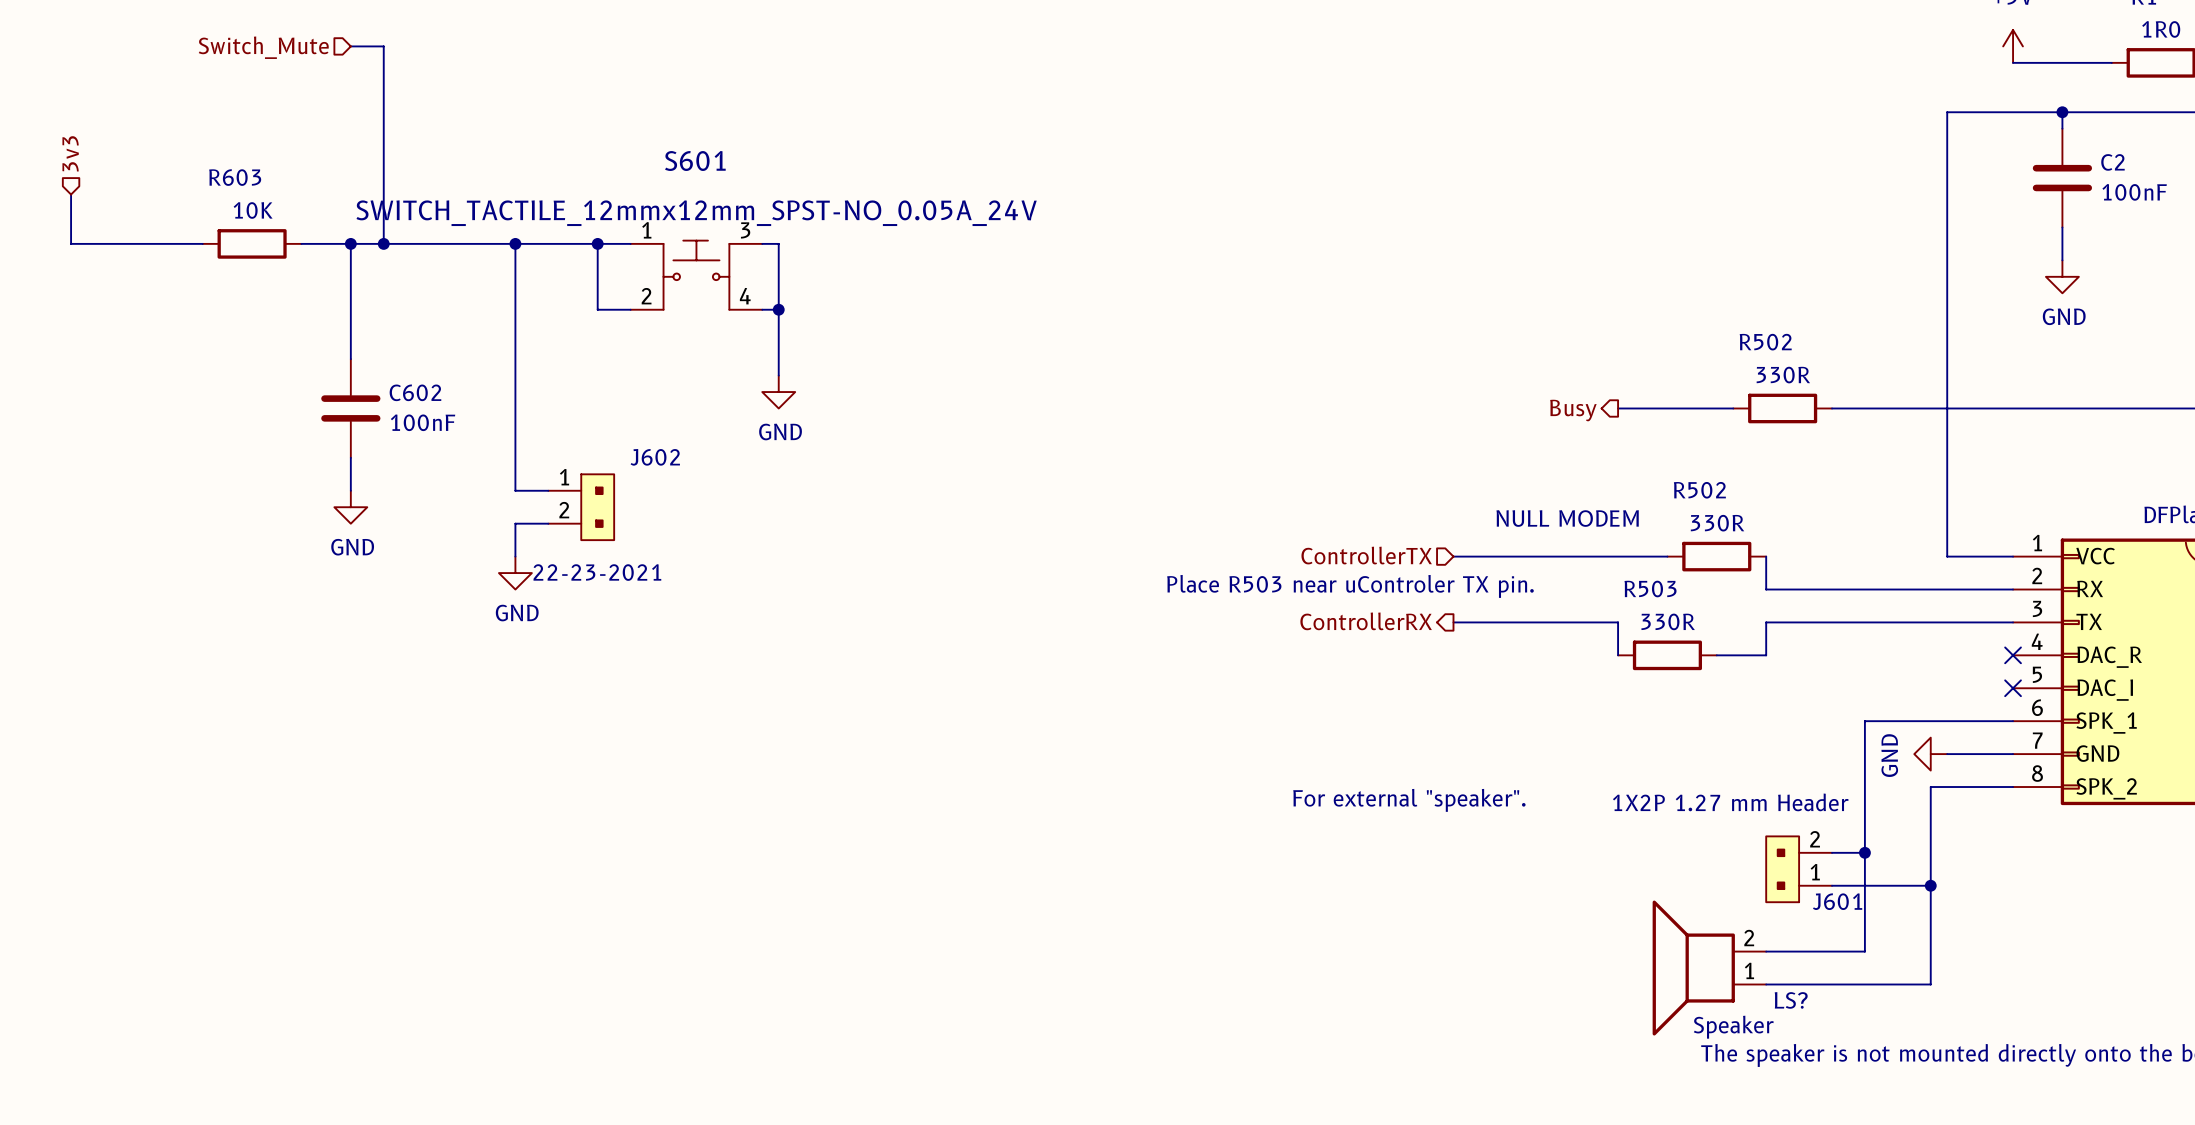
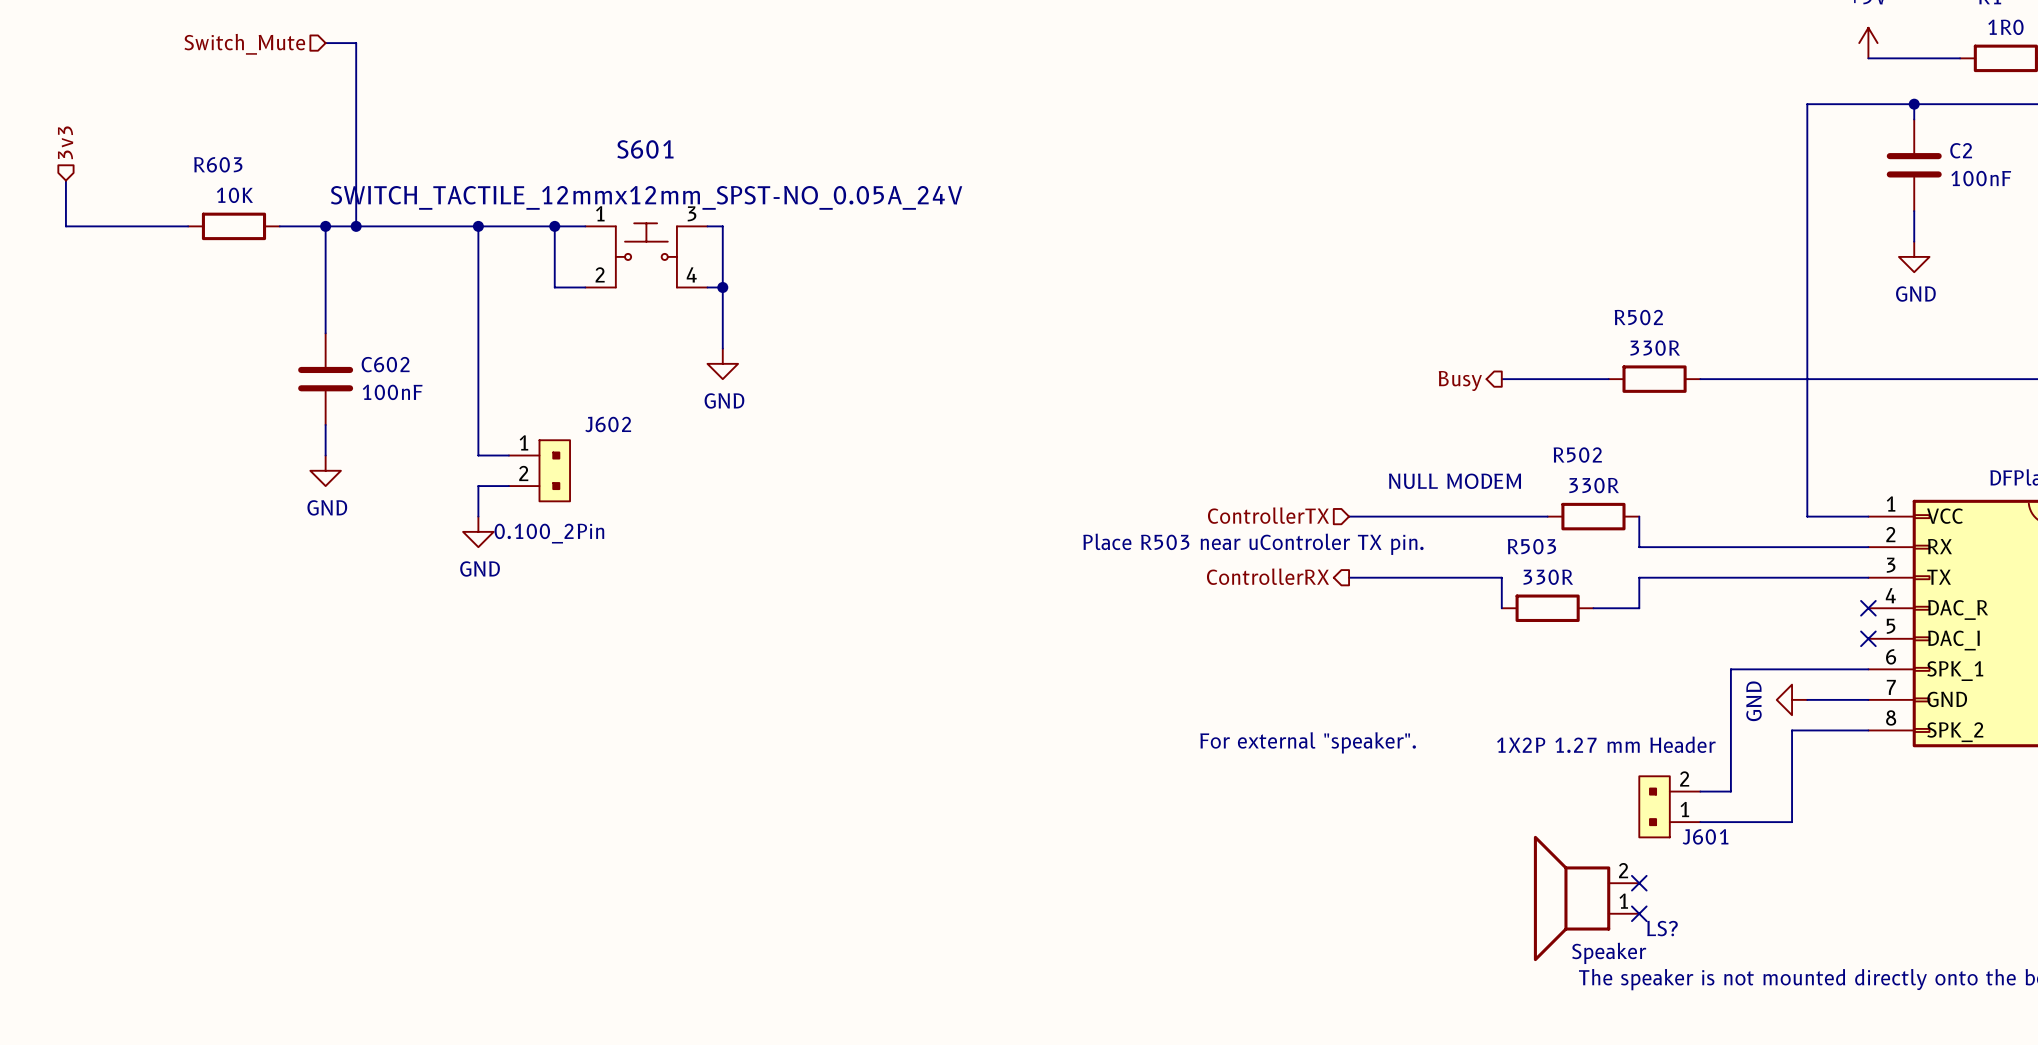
J602 value: 22-23-2021 (597, 572) -> 0.100_2Pin (549, 533)
wire: (1864, 852) (1864, 951) (1766, 951) -> none
junction: (1864, 852) -> none
wire: (1930, 885) (1930, 984) (1766, 984) -> none
junction: (1930, 885) -> none
no-connect mark: none -> (1639, 883)
no-connect mark: none -> (1639, 913)

